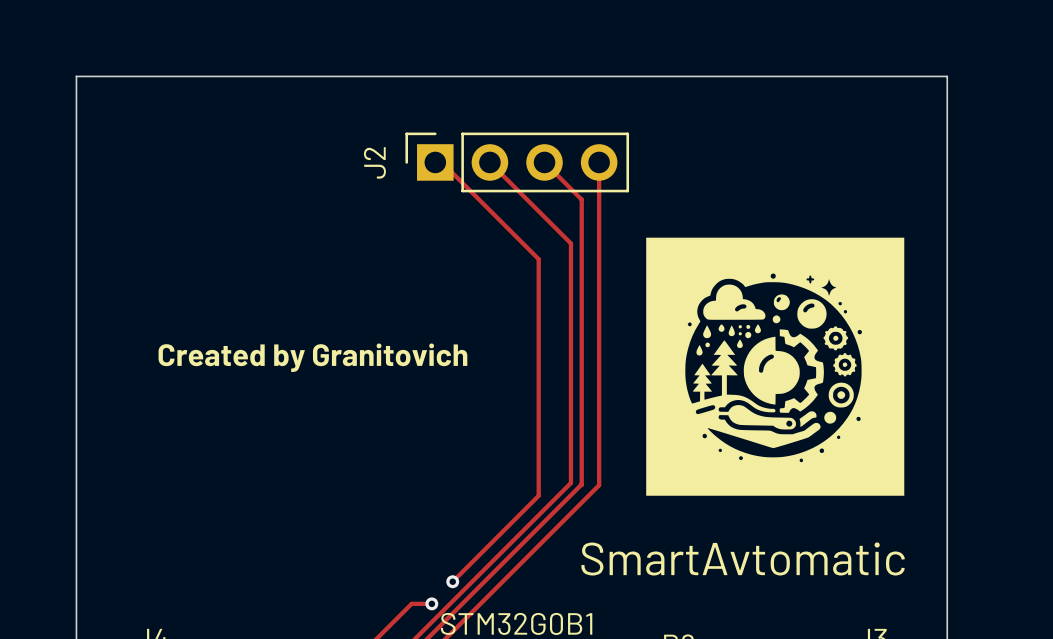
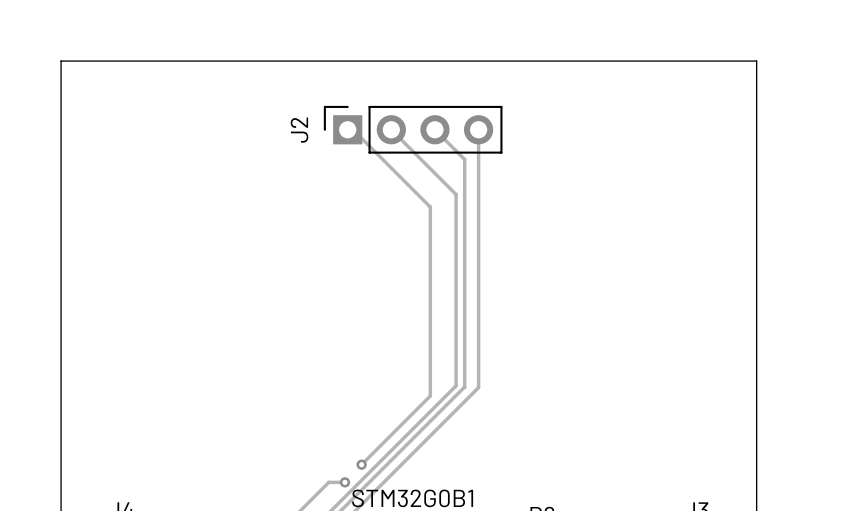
text: Created by Granitovich (312, 357) -> none
SmartAvtomatic: (775, 366) -> none

